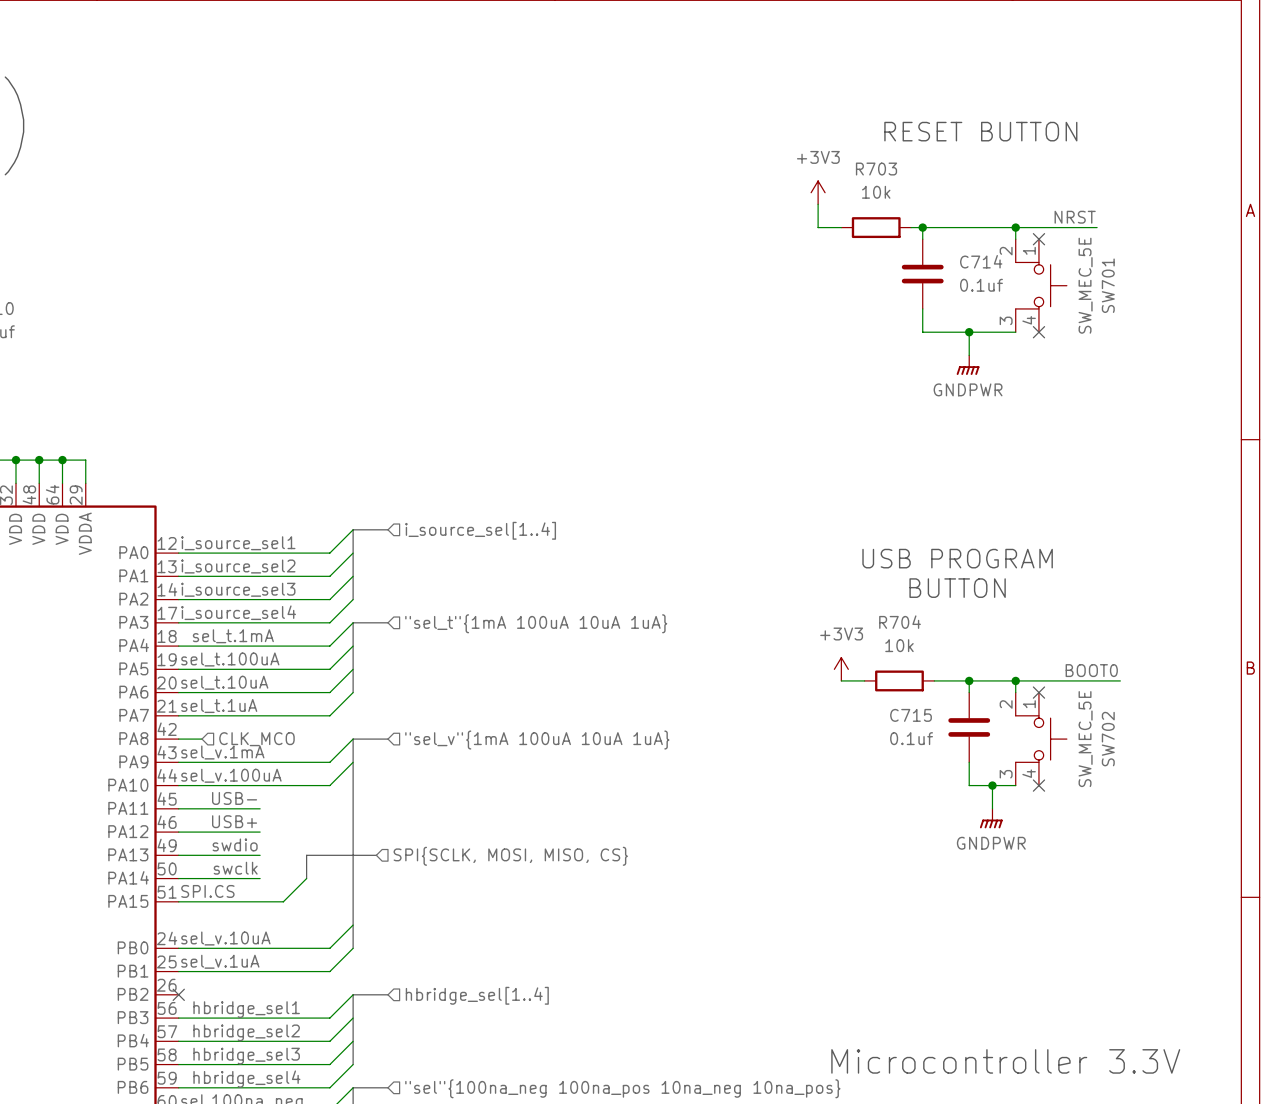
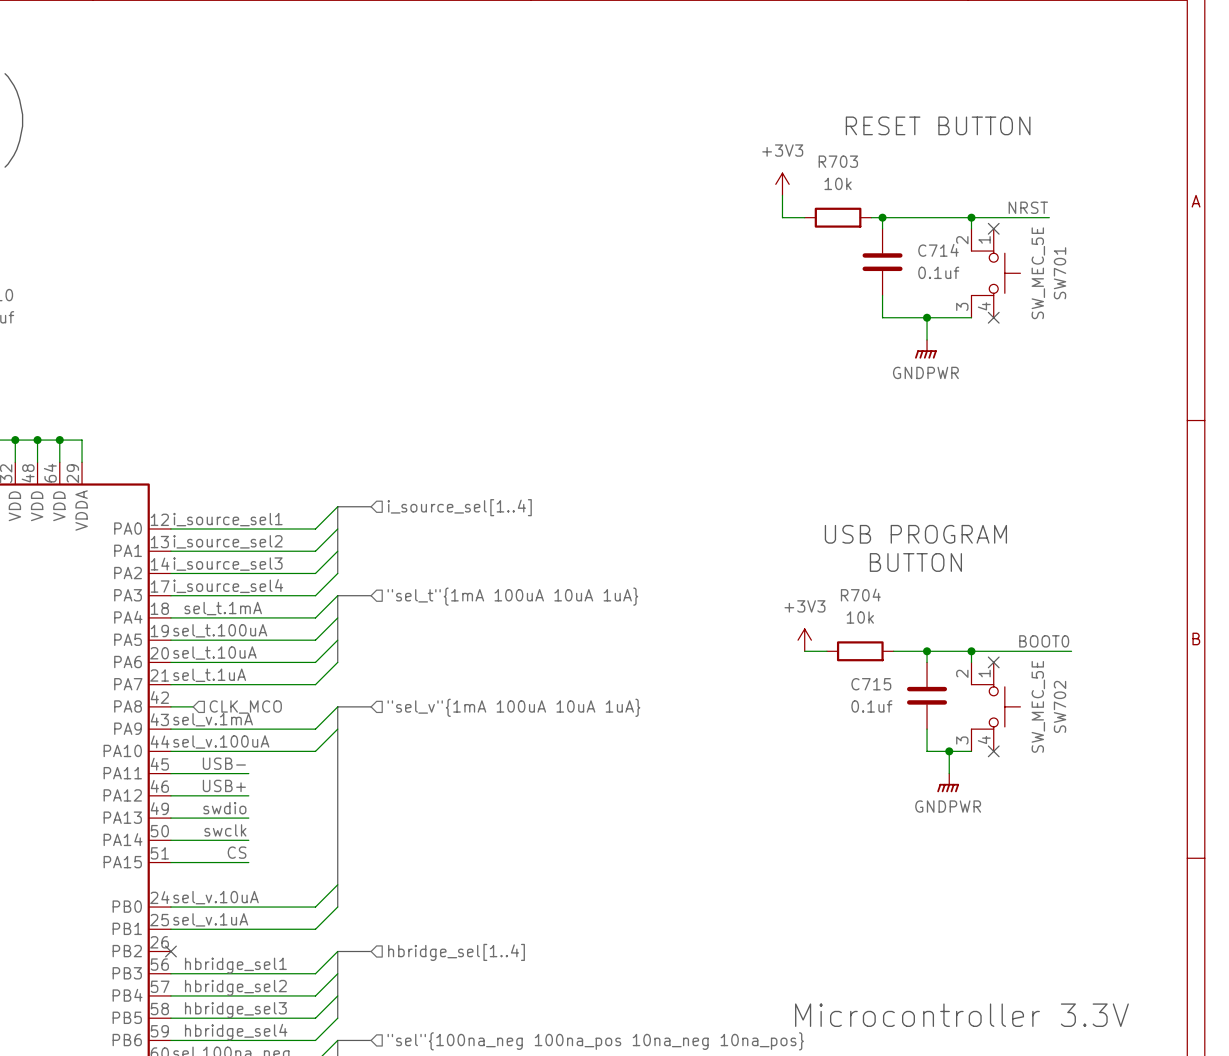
bus: (376, 855) (306, 855) (306, 878) -> none
hierarchical label: SPI{SCLK, MOSI, MISO, CS} (510, 856) -> none
wire: (306, 878) (283, 901) (260, 901) -> none
label: SPI.CS (207, 891) -> none
label: none -> CS (237, 852)

